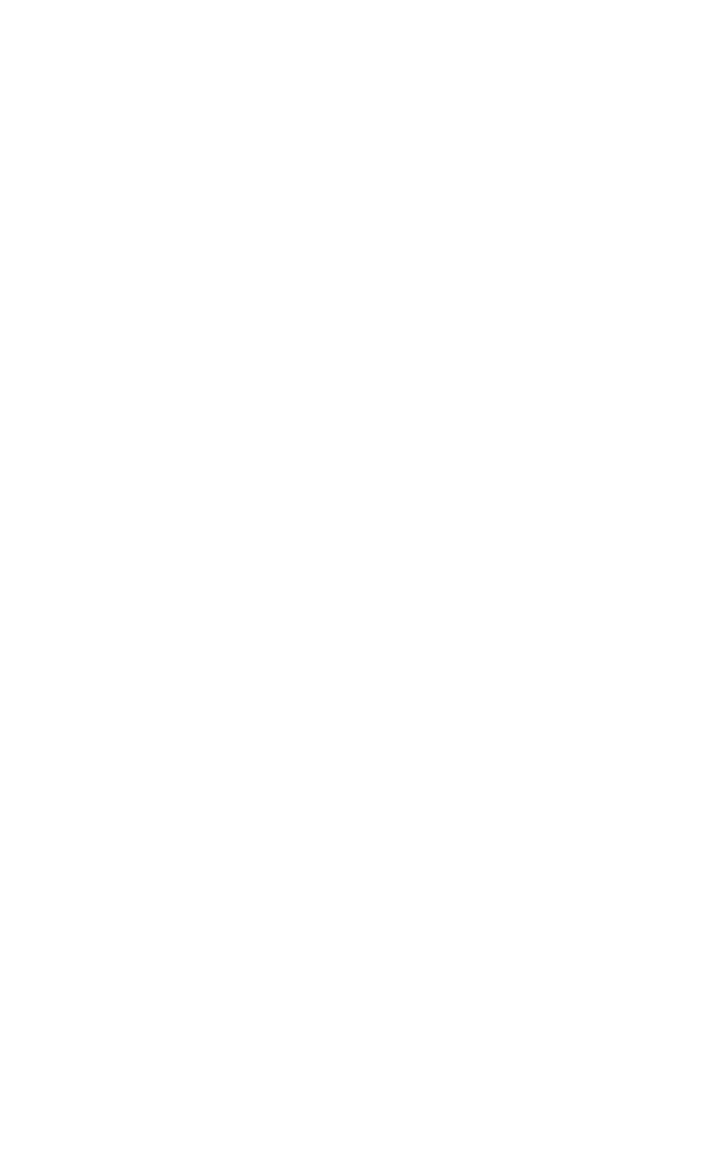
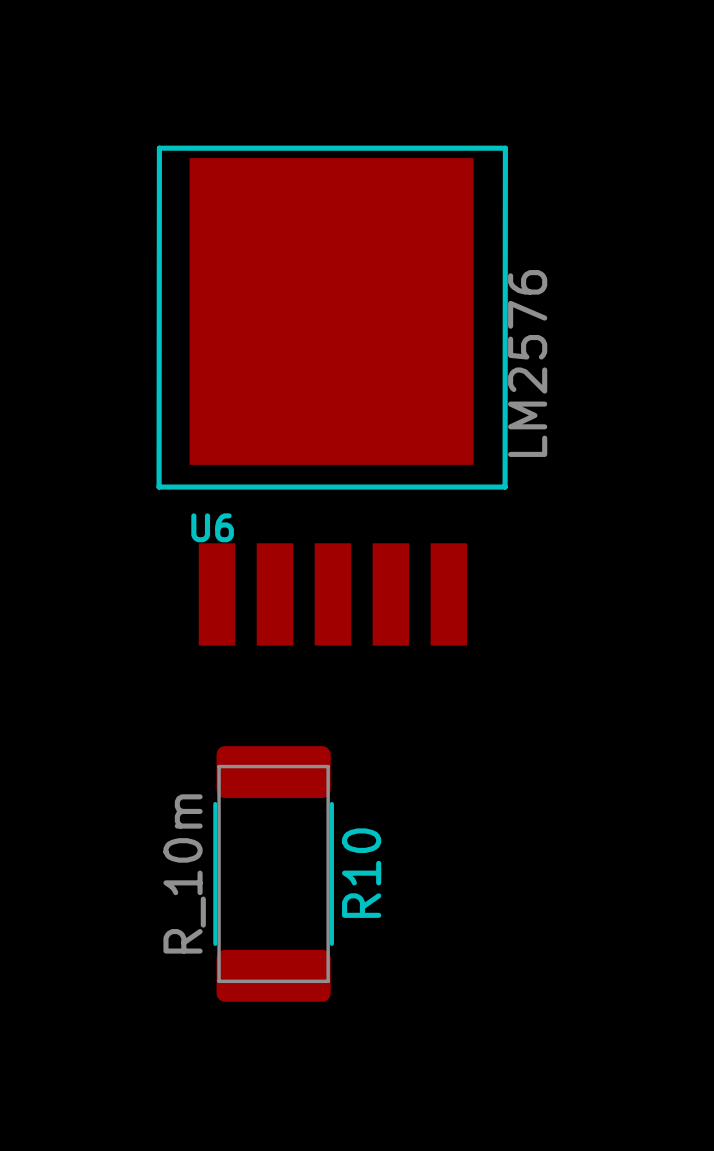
U6: none -> LM2576 (332, 395)
R10: none -> R_10m (273, 873)

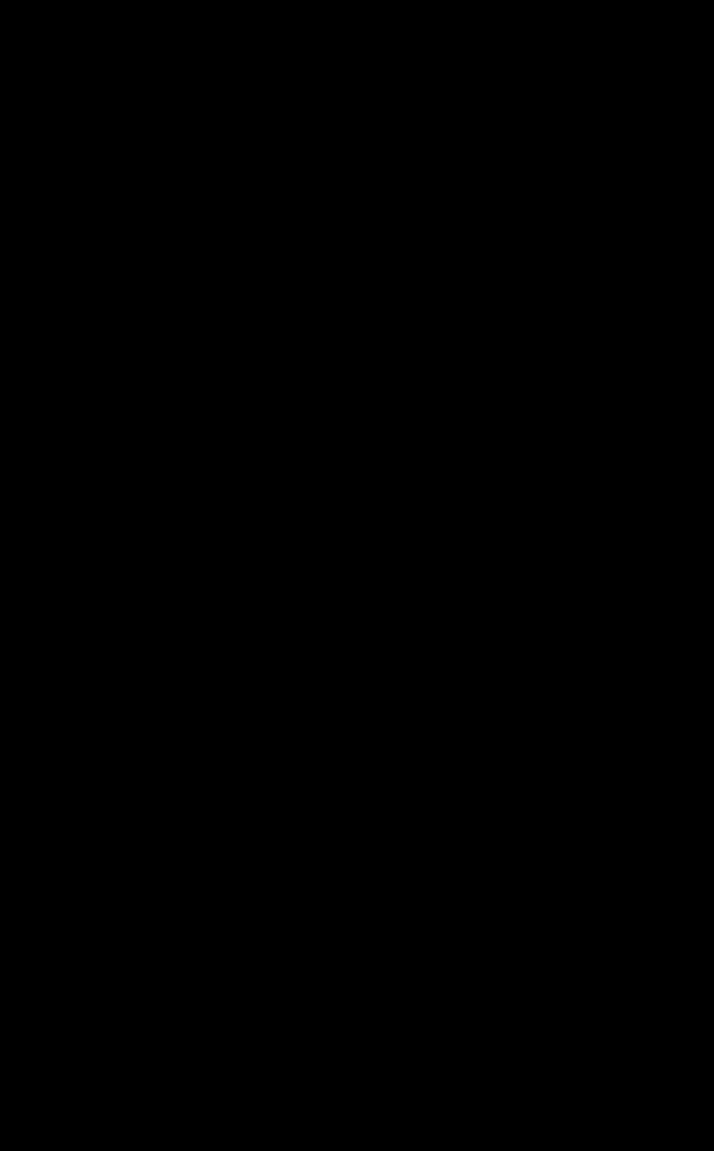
U6: LM2576 (332, 395) -> none
R10: R_10m (273, 873) -> none

